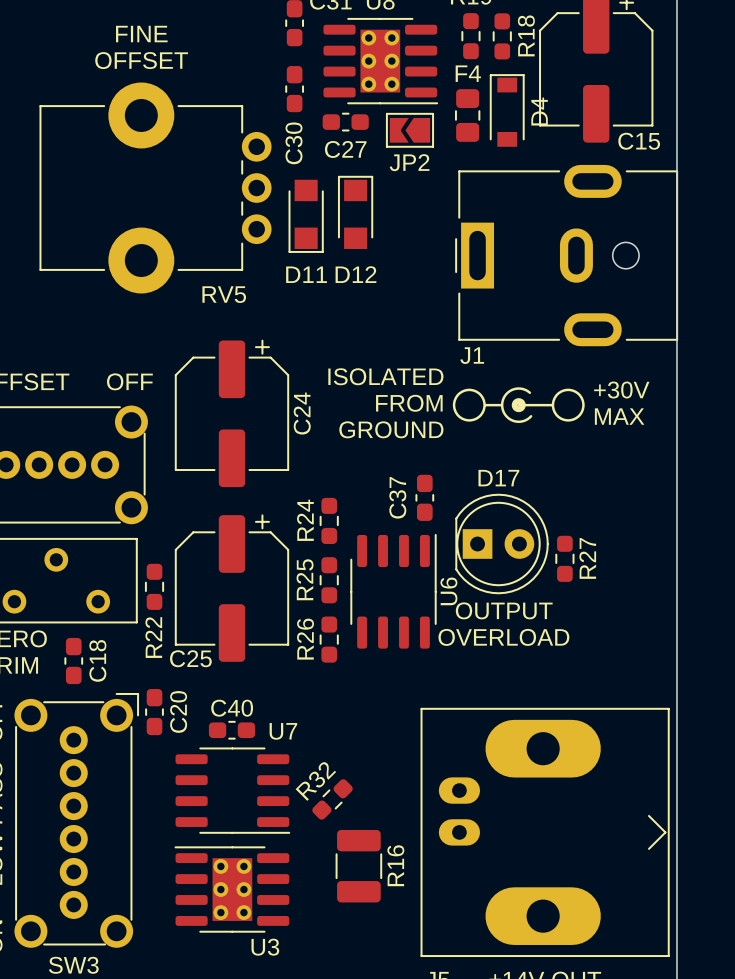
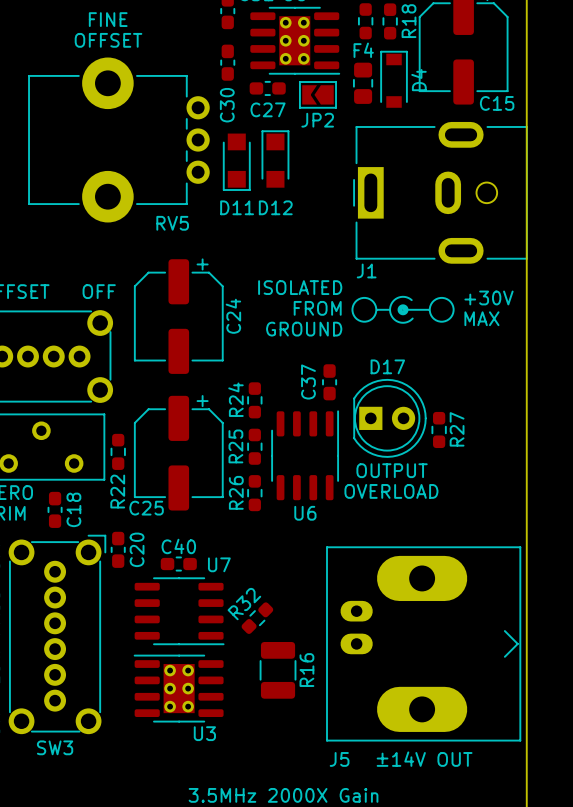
U6 name rotation: 0° (448, 591) -> 90° clockwise (305, 513)
U6 name position: U6 (448, 591) -> U6 (305, 513)

